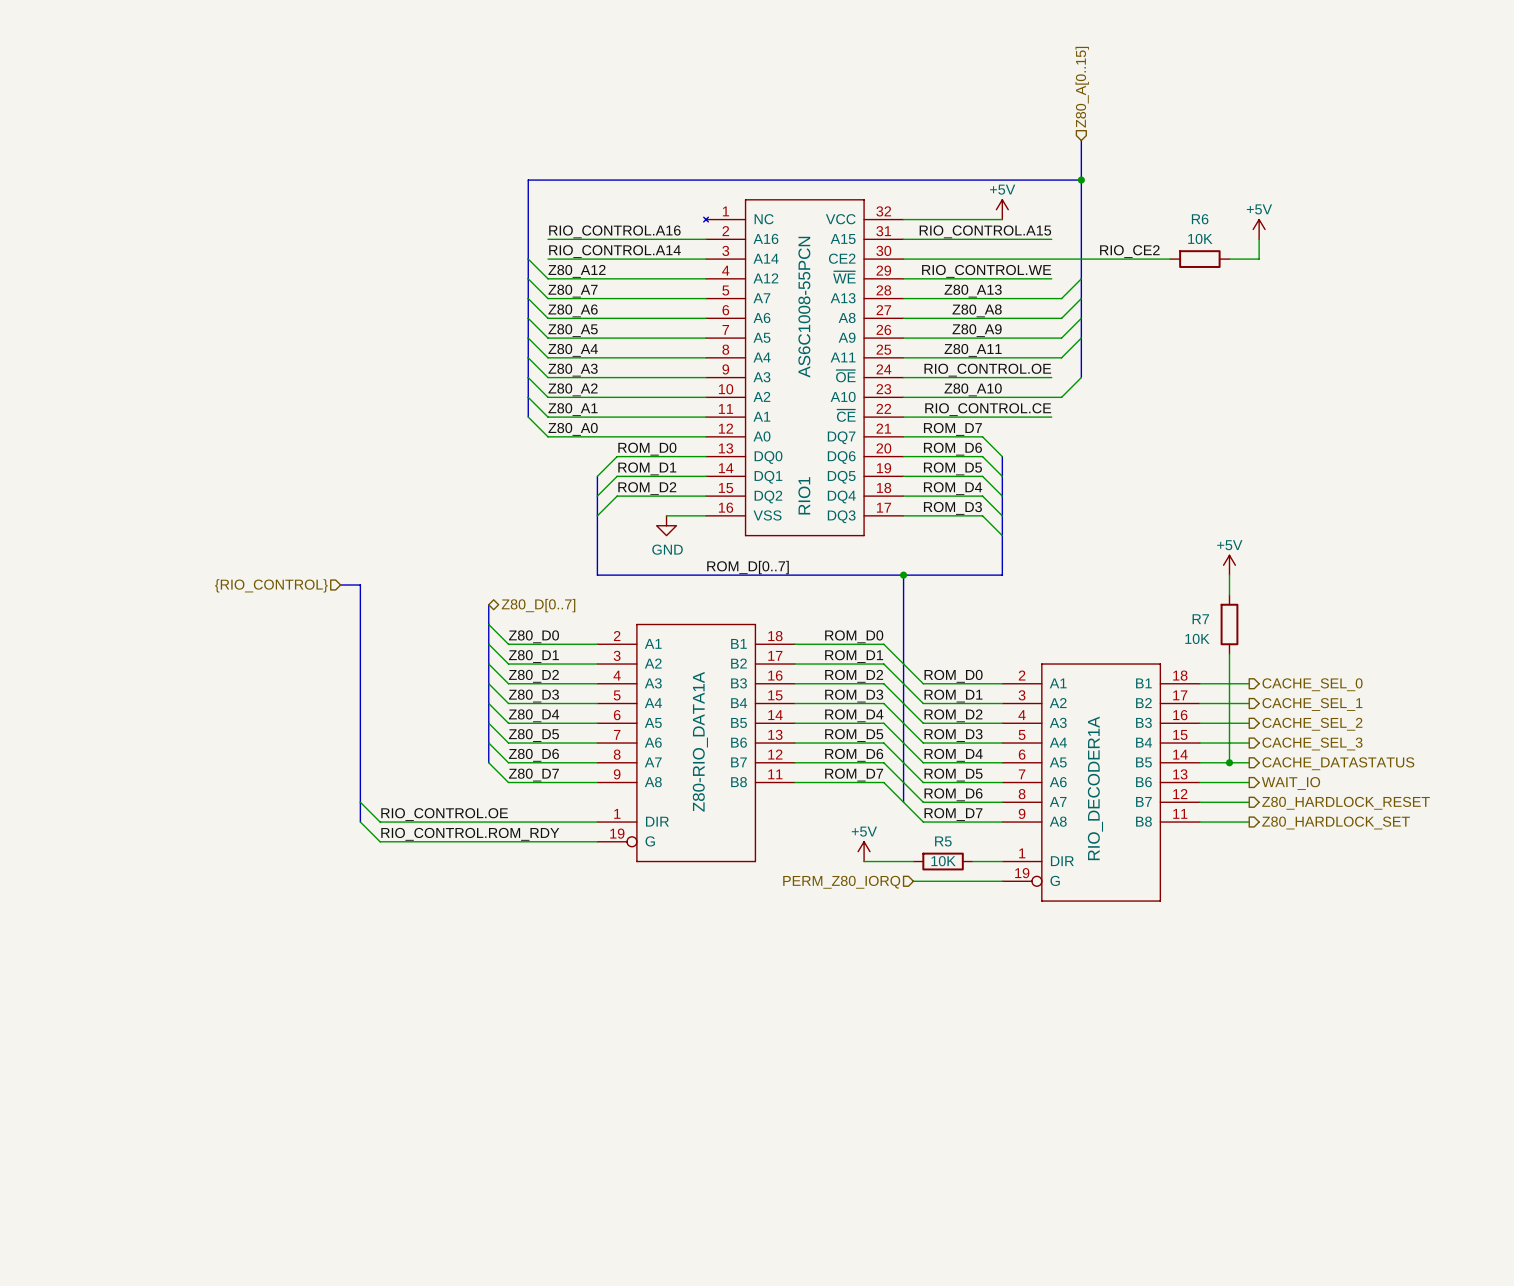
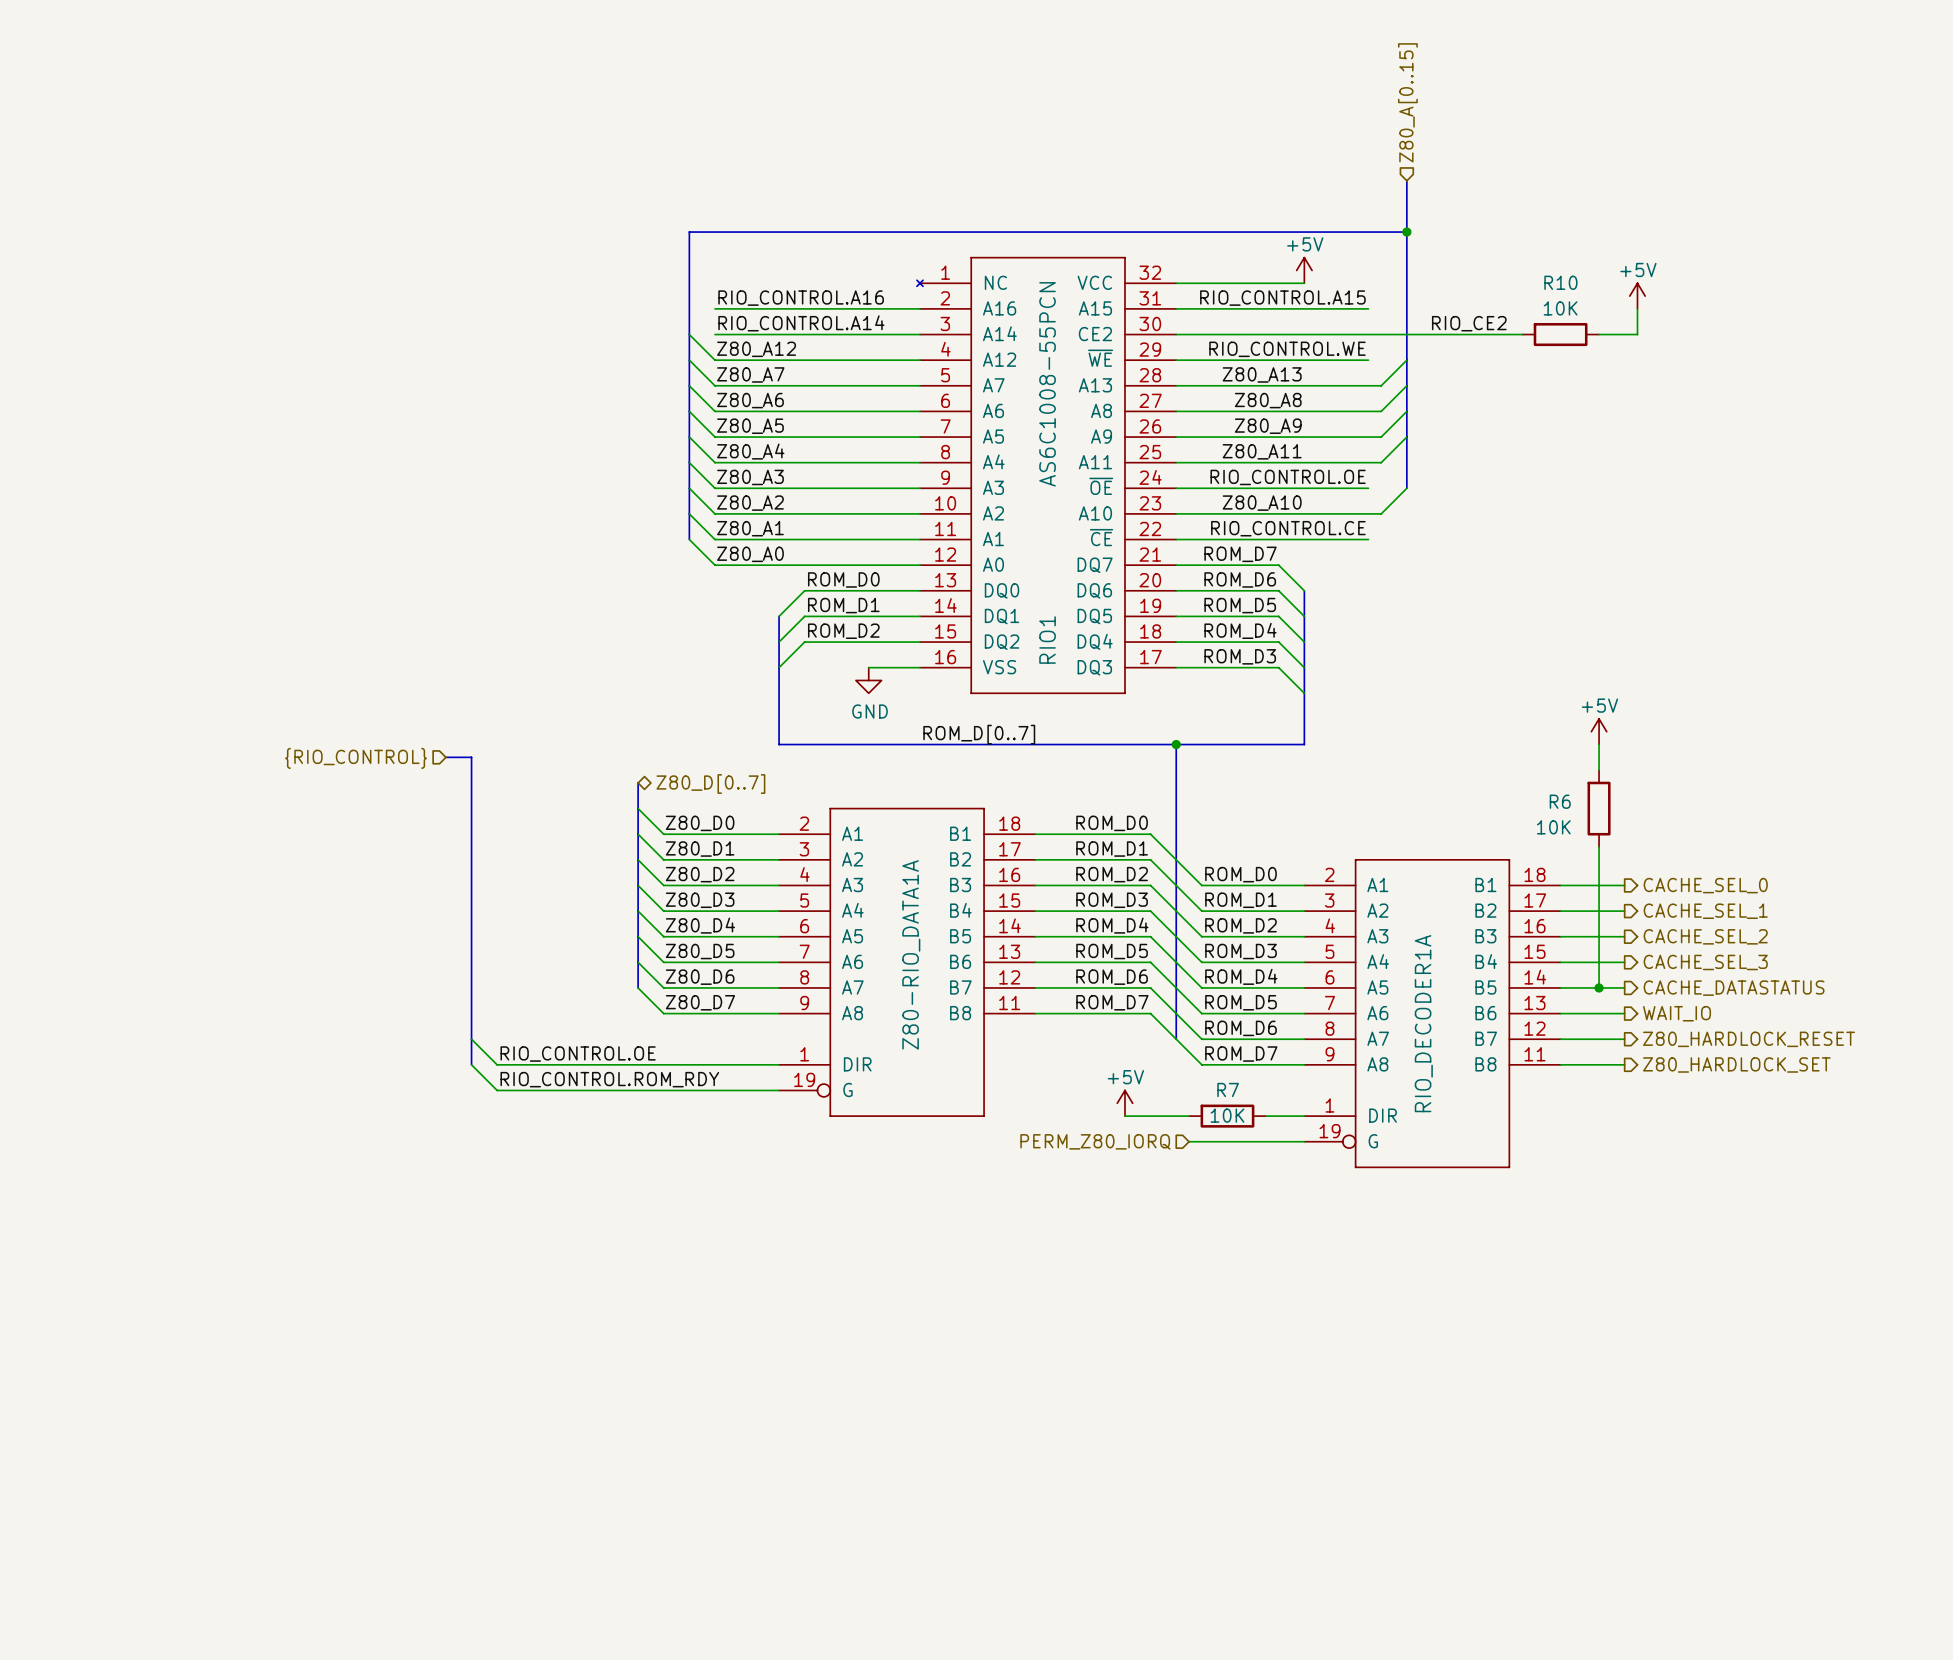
R6 name: R6 (1200, 219) -> R10 (1560, 282)
R7 name: R7 (1200, 619) -> R6 (1560, 801)
R5 name: R5 (943, 841) -> R7 (1228, 1089)

